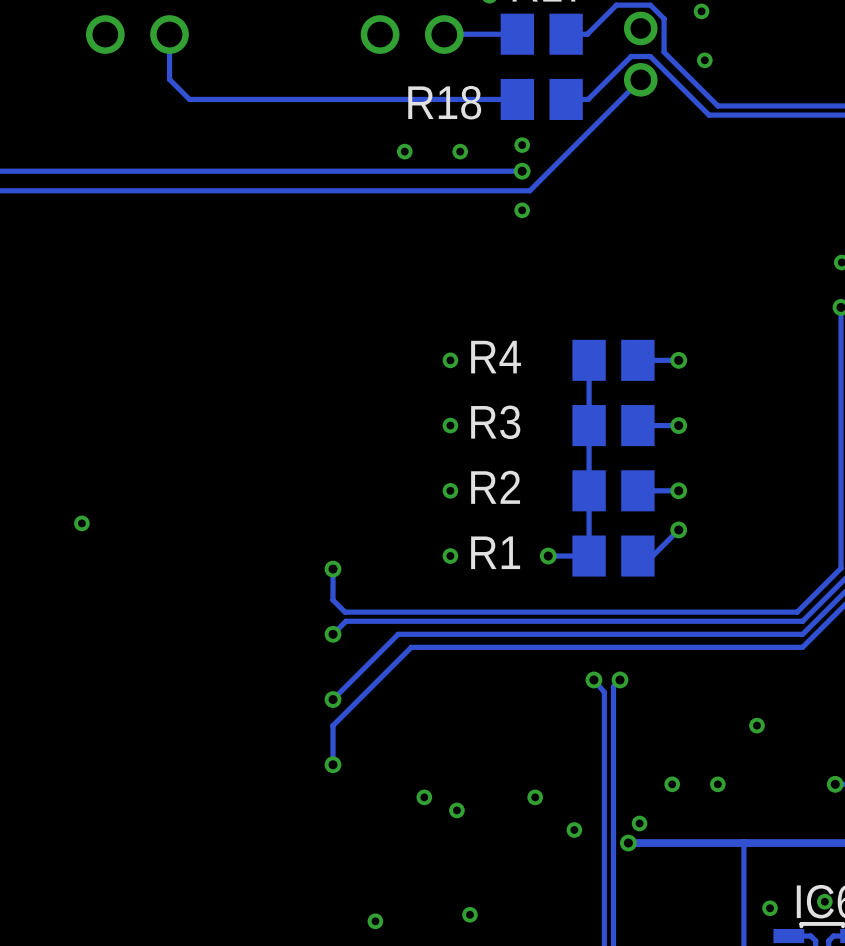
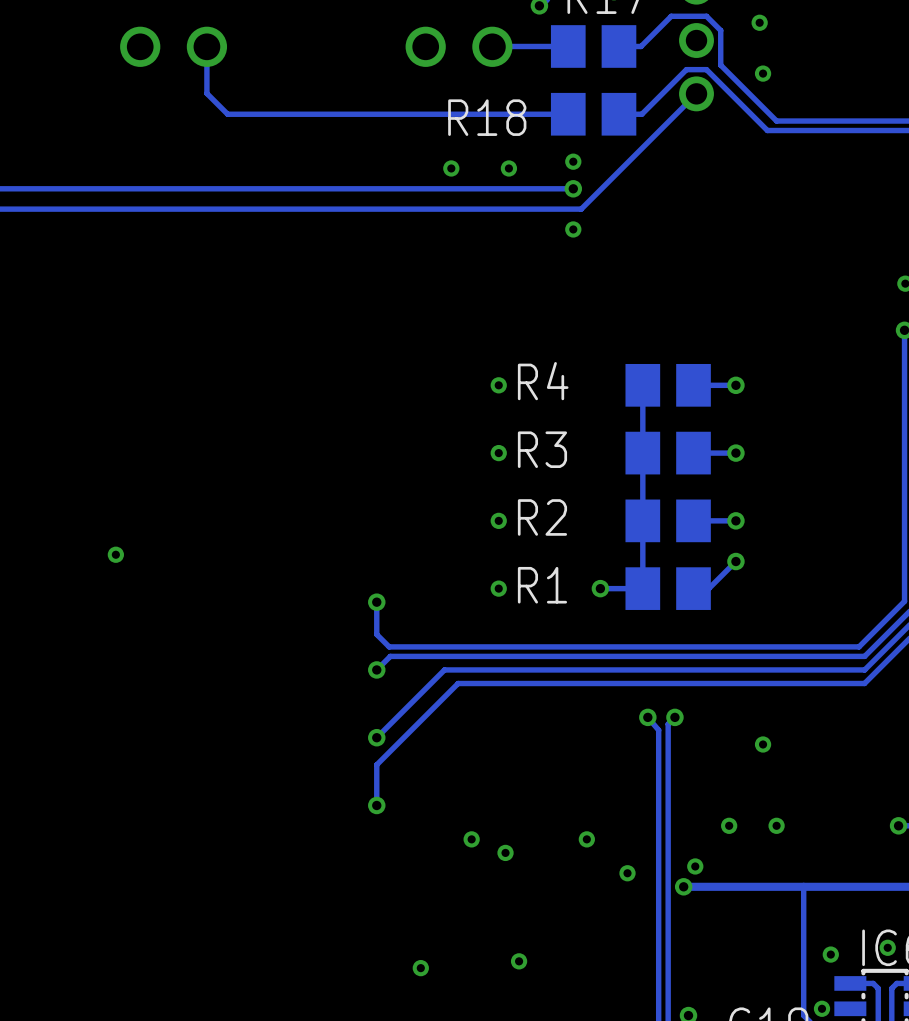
via position: (756, 725) -> (763, 744)

